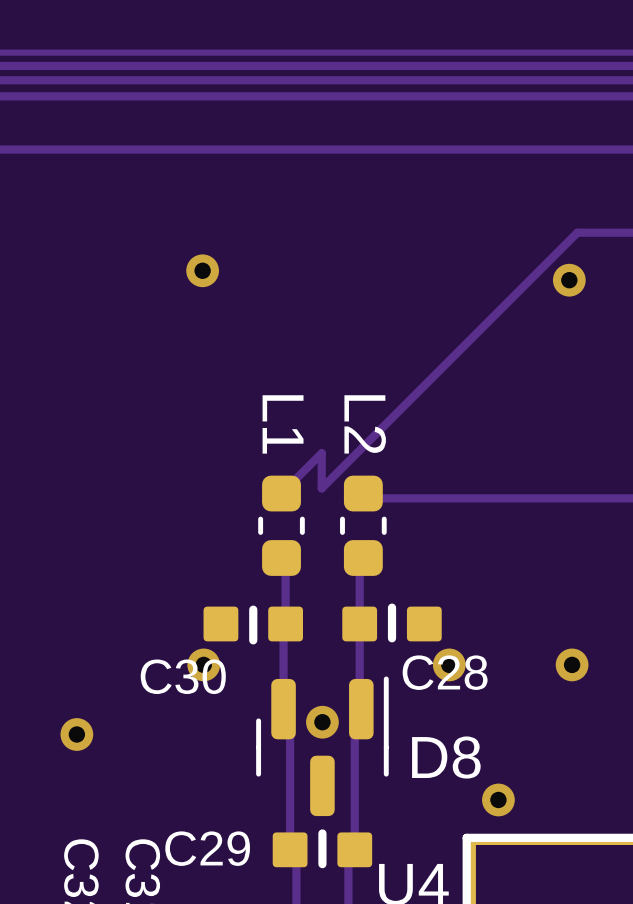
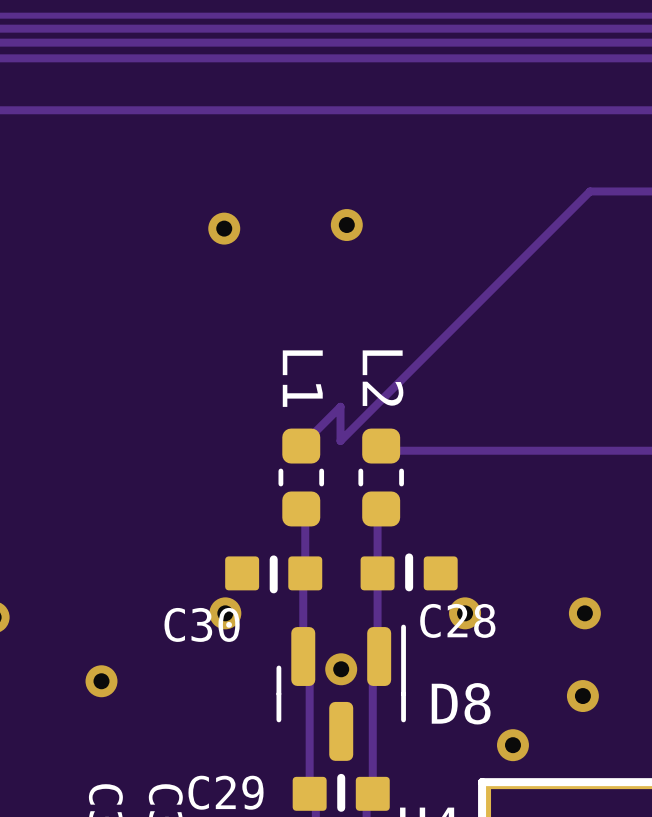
via: none -> (346, 225)
via: (569, 280) -> none
via: none -> (582, 696)

